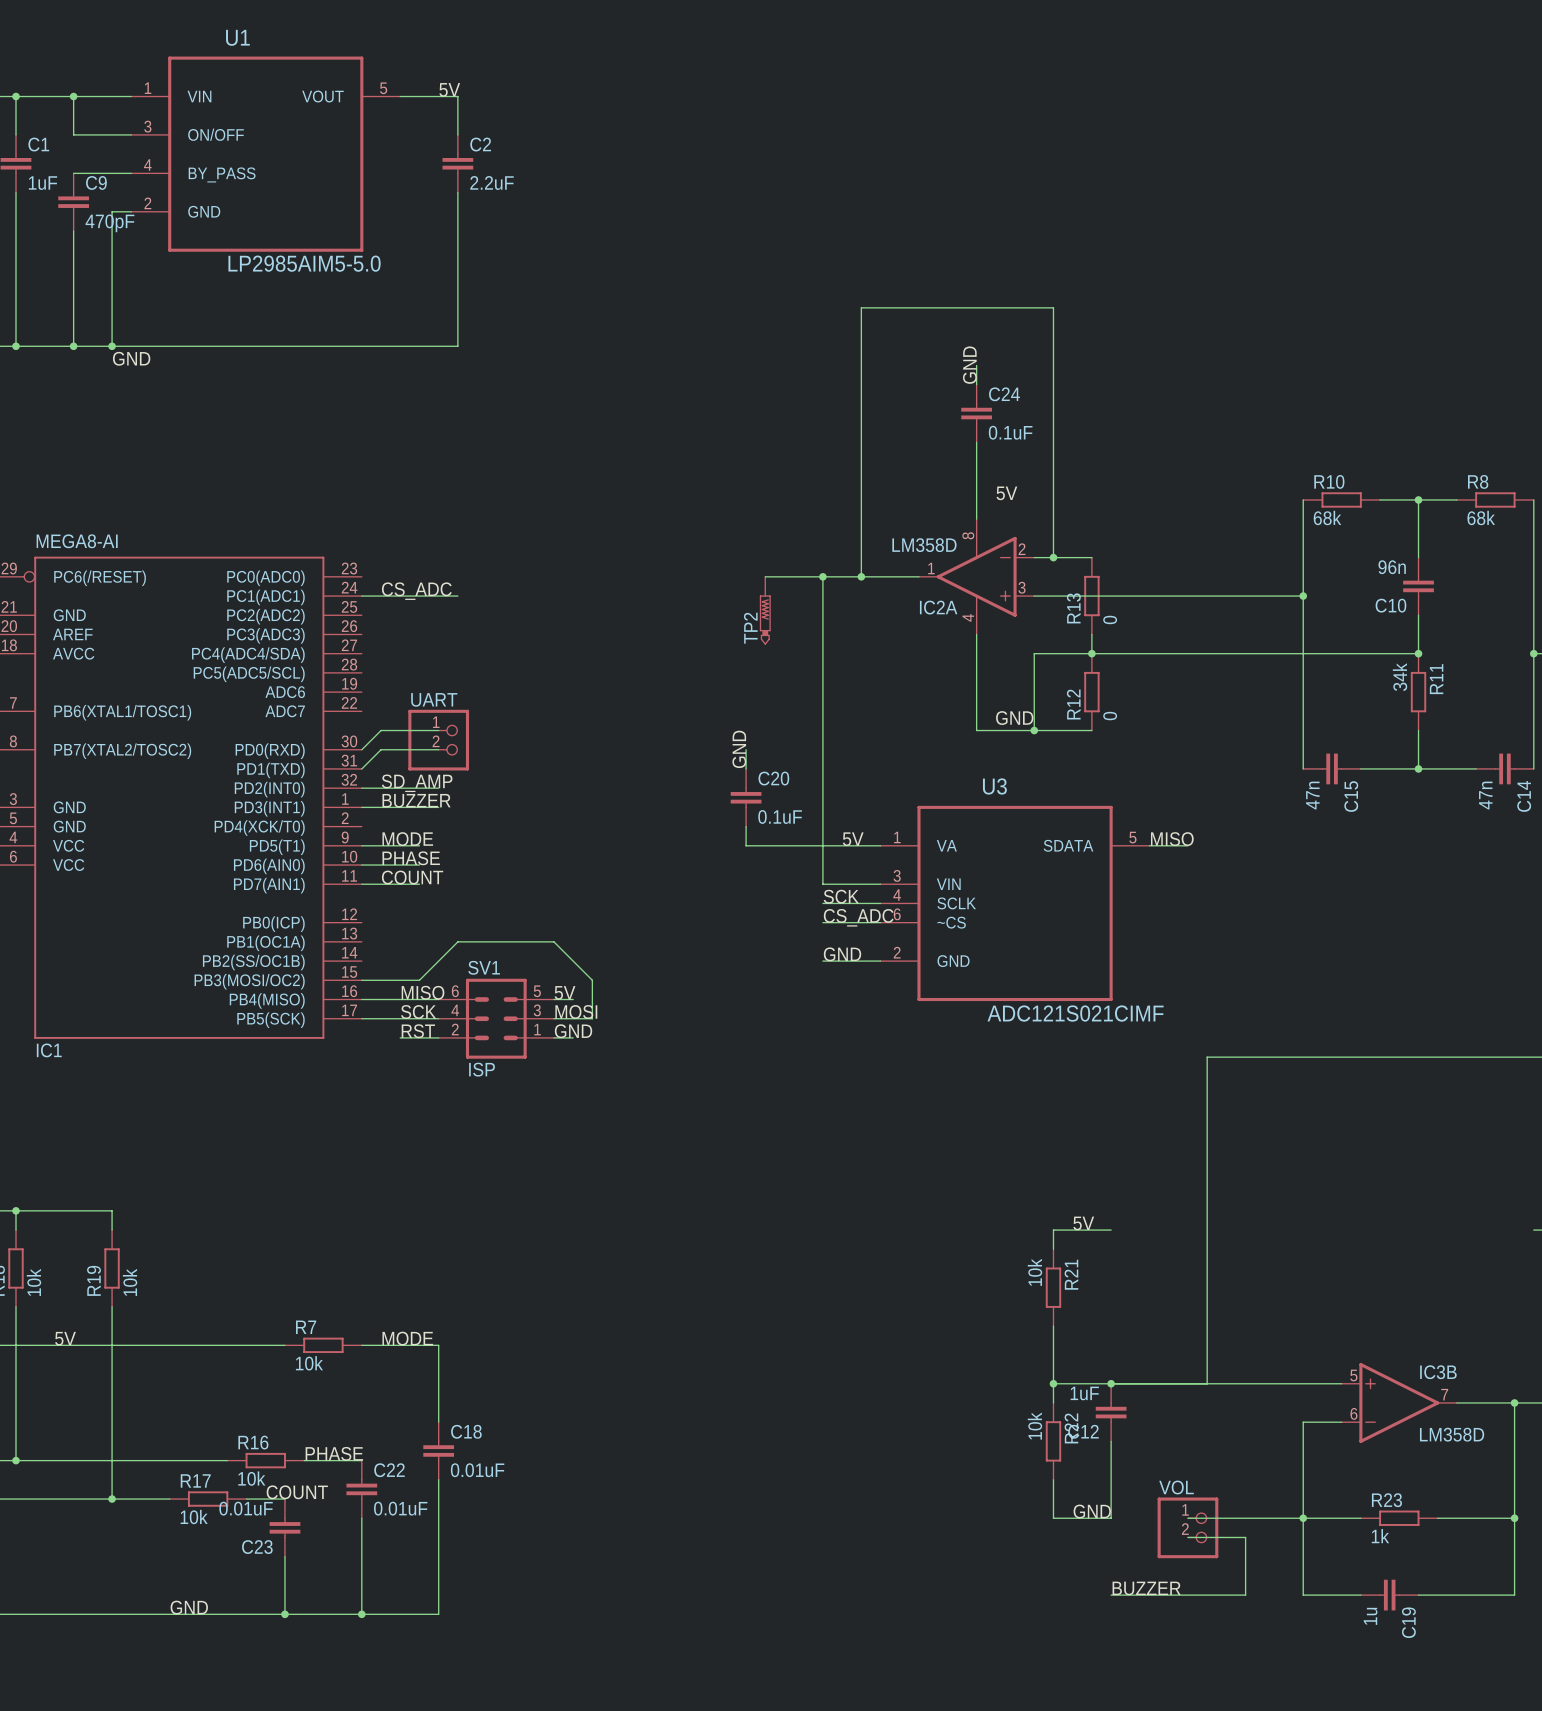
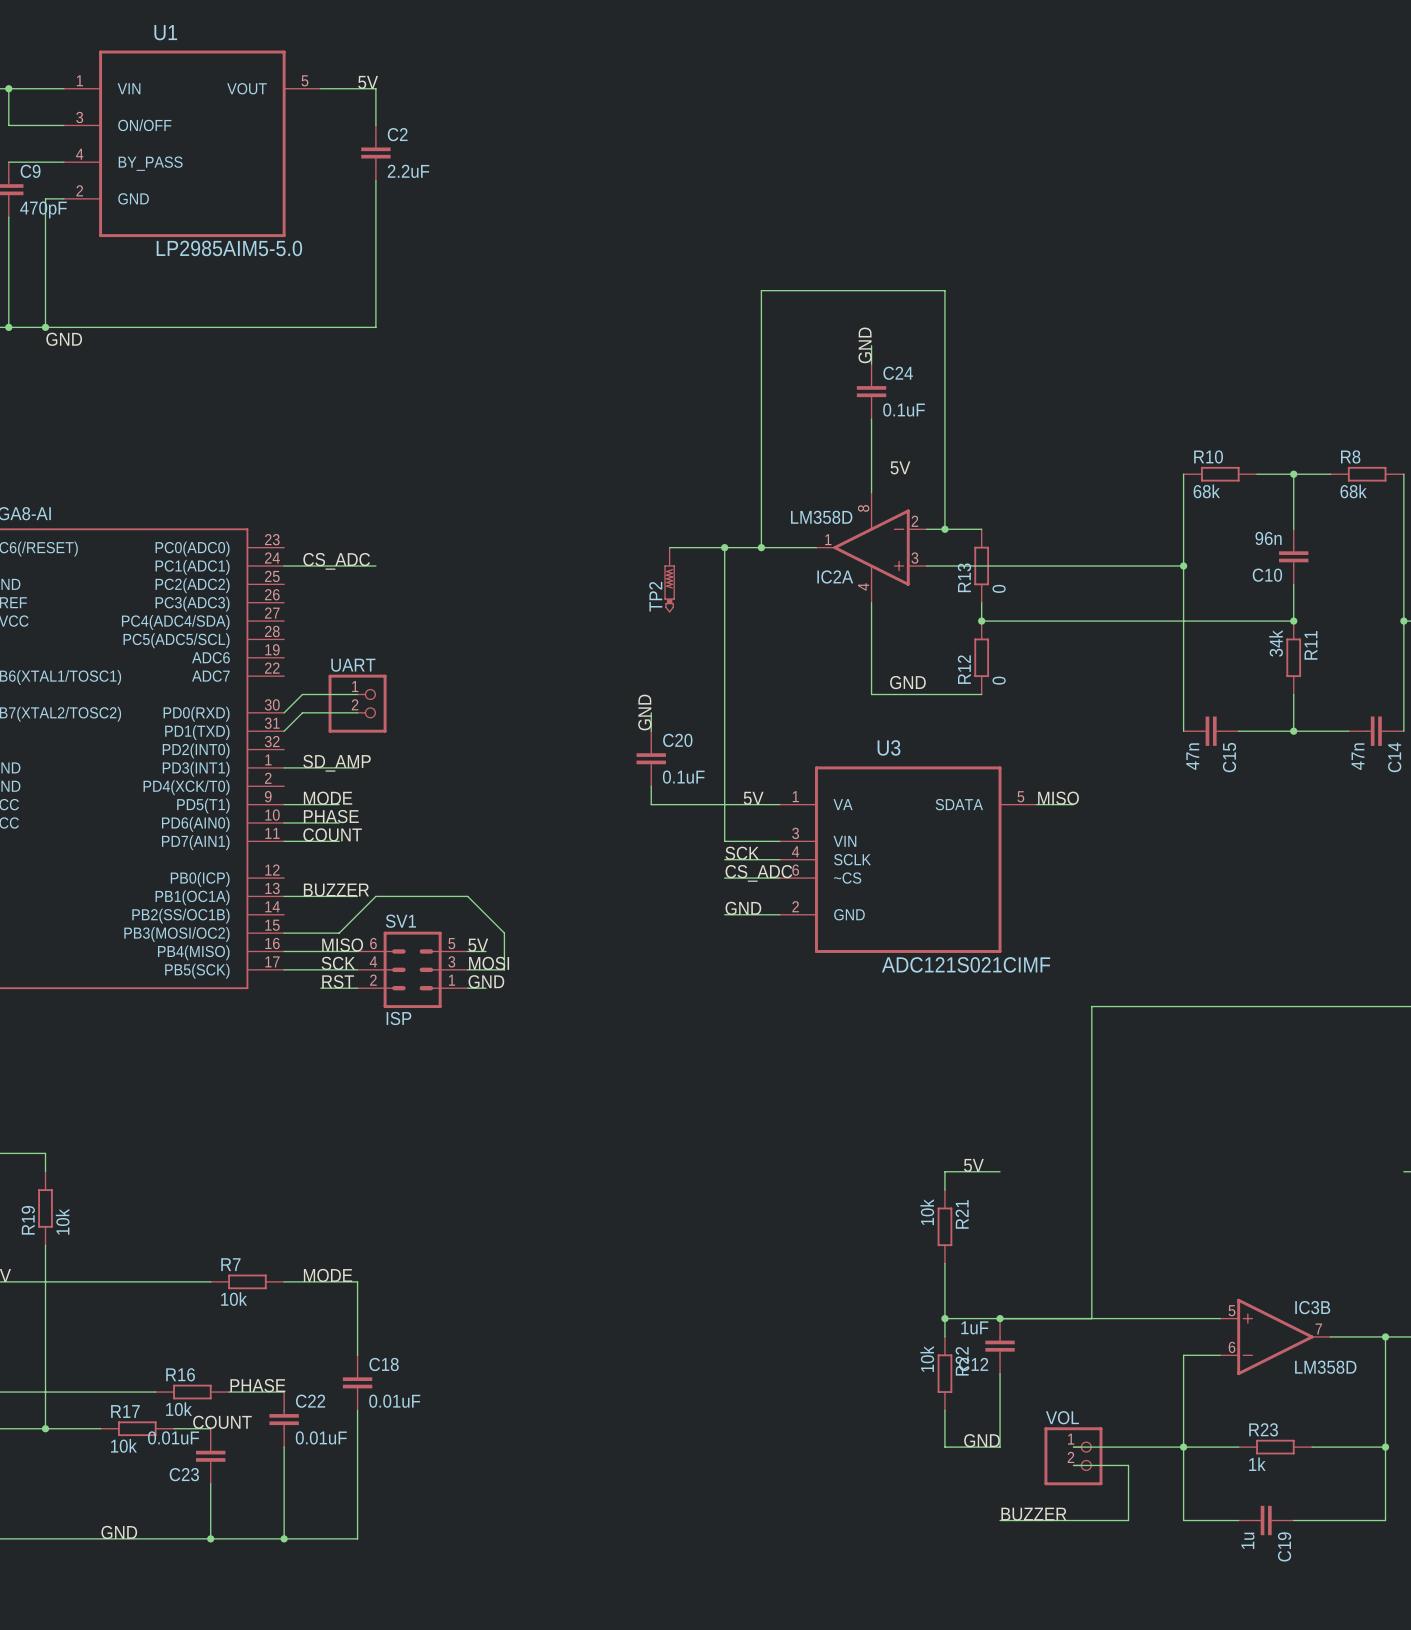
wire: (1091, 653) (1034, 653) (1034, 730) -> none
junction: (1034, 730) -> none
label: SD_AMP (417, 783) -> none
wire: (361, 788) (438, 788) -> (284, 896) (357, 896)
label: BUZZER (416, 800) -> SD_AMP (337, 763)
label: none -> BUZZER (336, 890)

